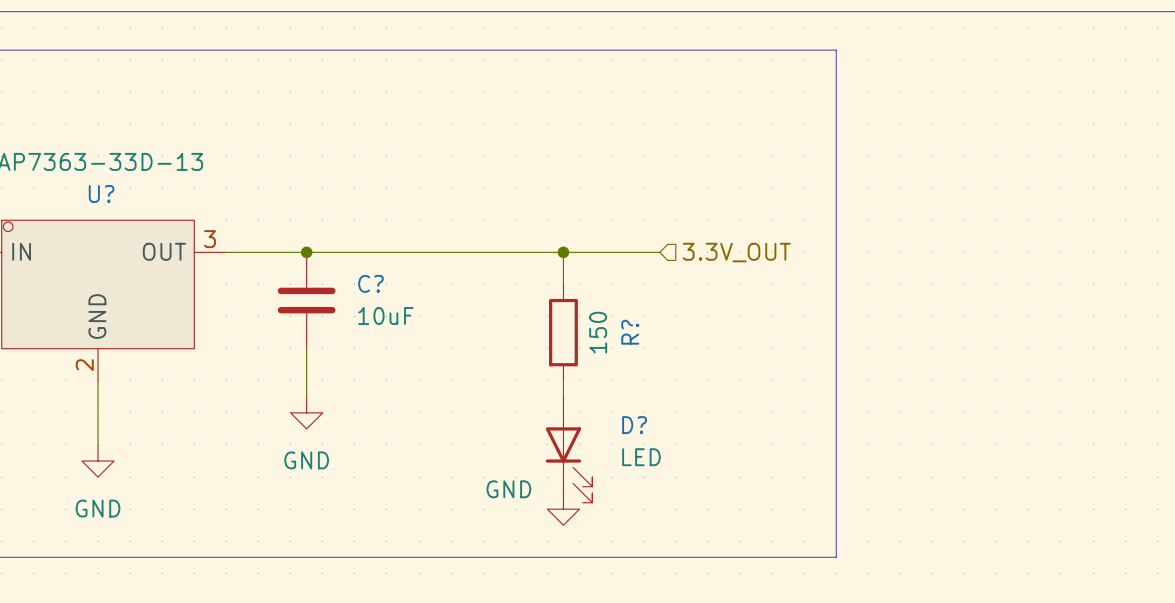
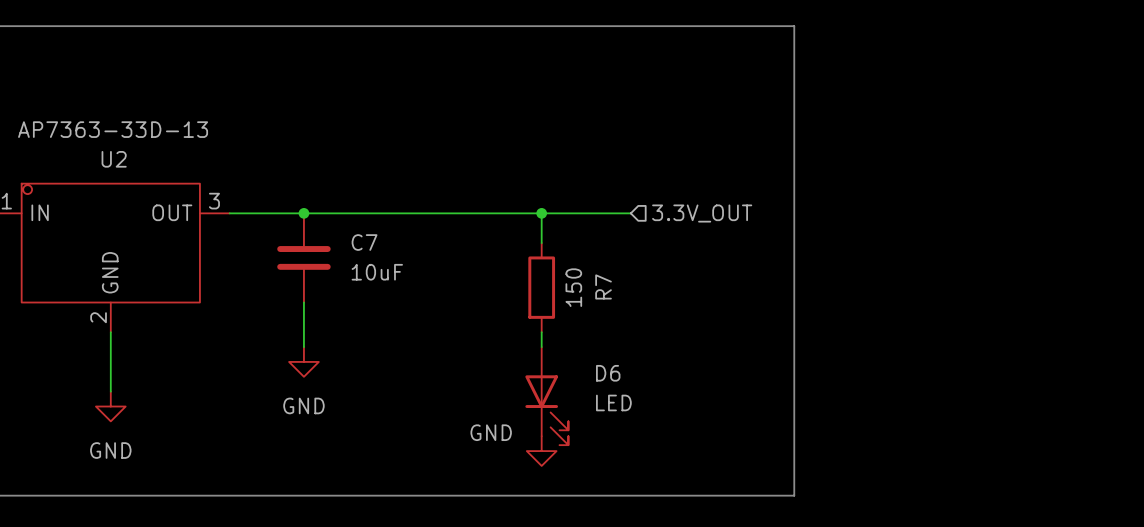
U? name: U? (101, 194) -> U2 (114, 159)
C? name: C? (370, 283) -> C7 (364, 242)
R? name: R? (630, 332) -> R7 (603, 286)
D? name: D? (634, 425) -> D6 (608, 373)

